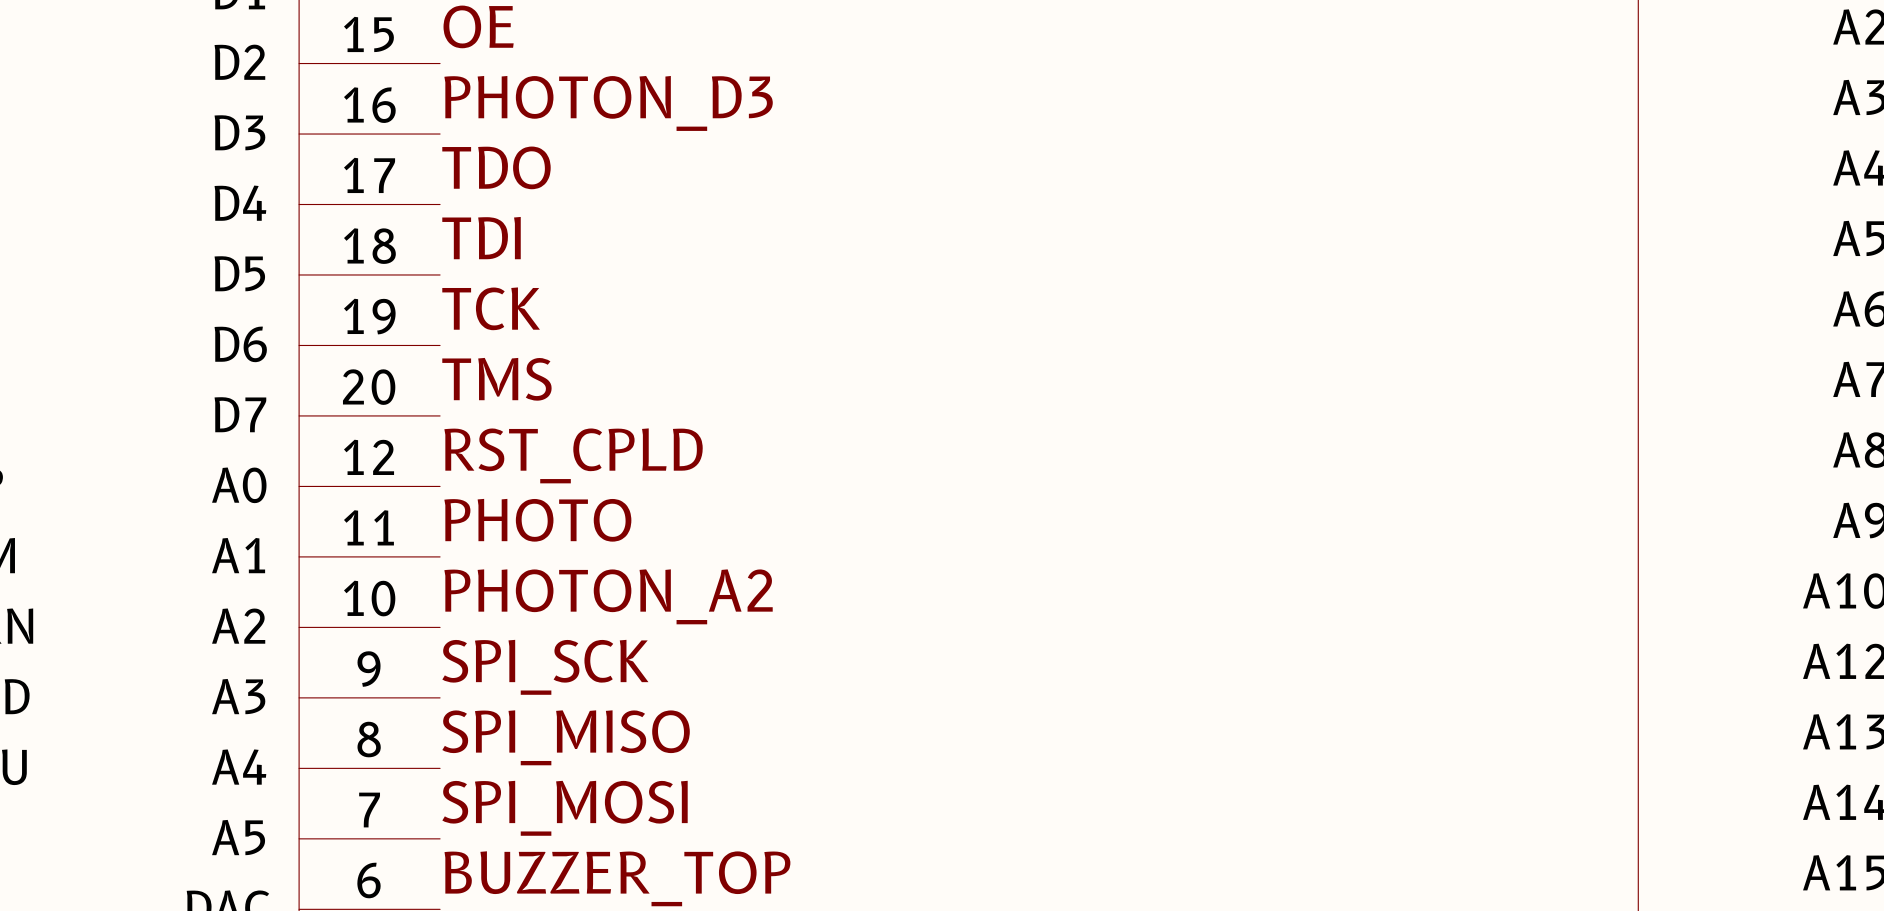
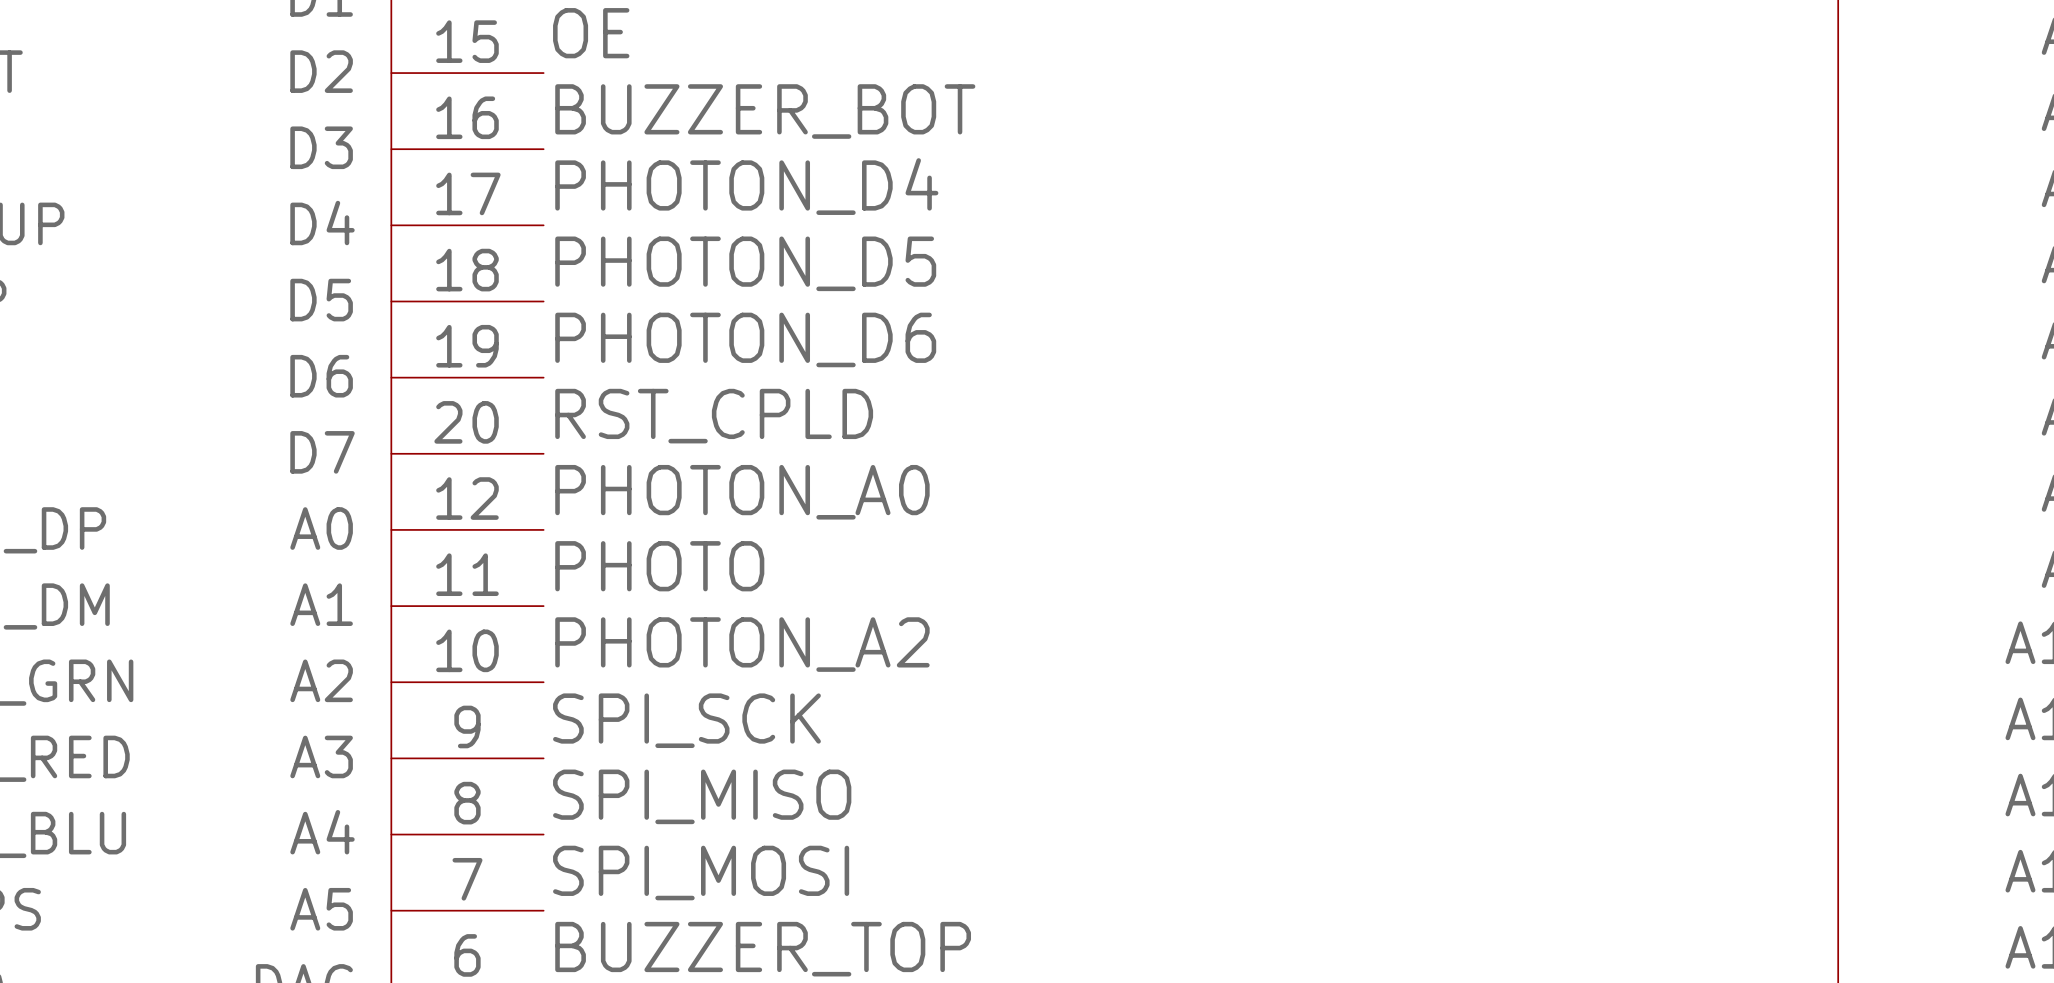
label: PHOTON_D3 (608, 103) -> BUZZER_BOT (765, 111)
label: TDO (496, 167) -> PHOTON_D4 (746, 186)
label: TDI (481, 238) -> PHOTON_D5 (745, 263)
label: TCK (491, 308) -> PHOTON_D6 (745, 339)
label: TMS (496, 379) -> RST_CPLD (714, 416)
label: RST_CPLD (573, 455) -> PHOTON_A0 (742, 492)

